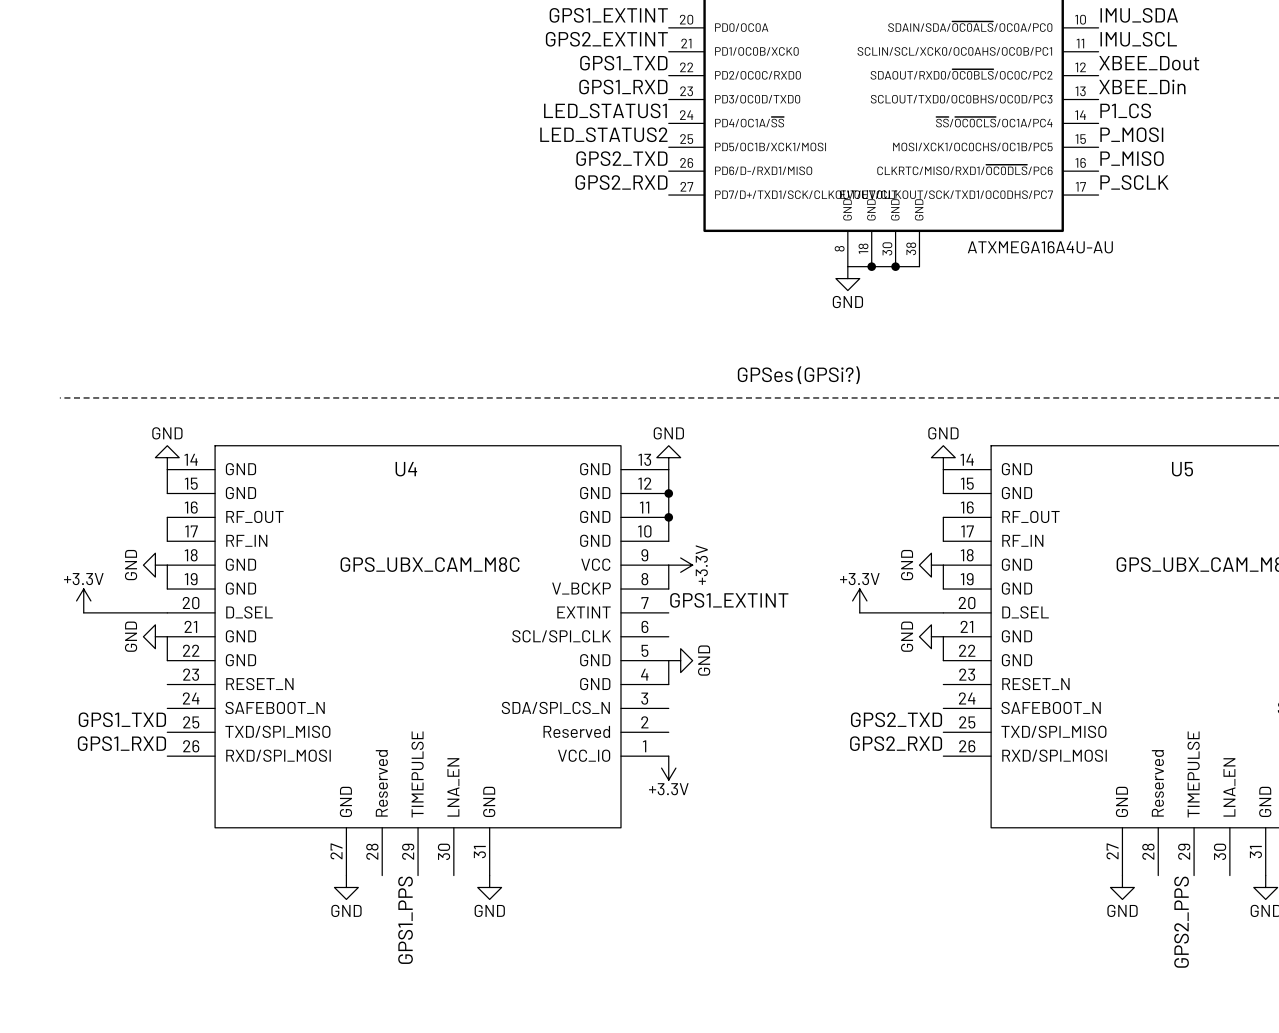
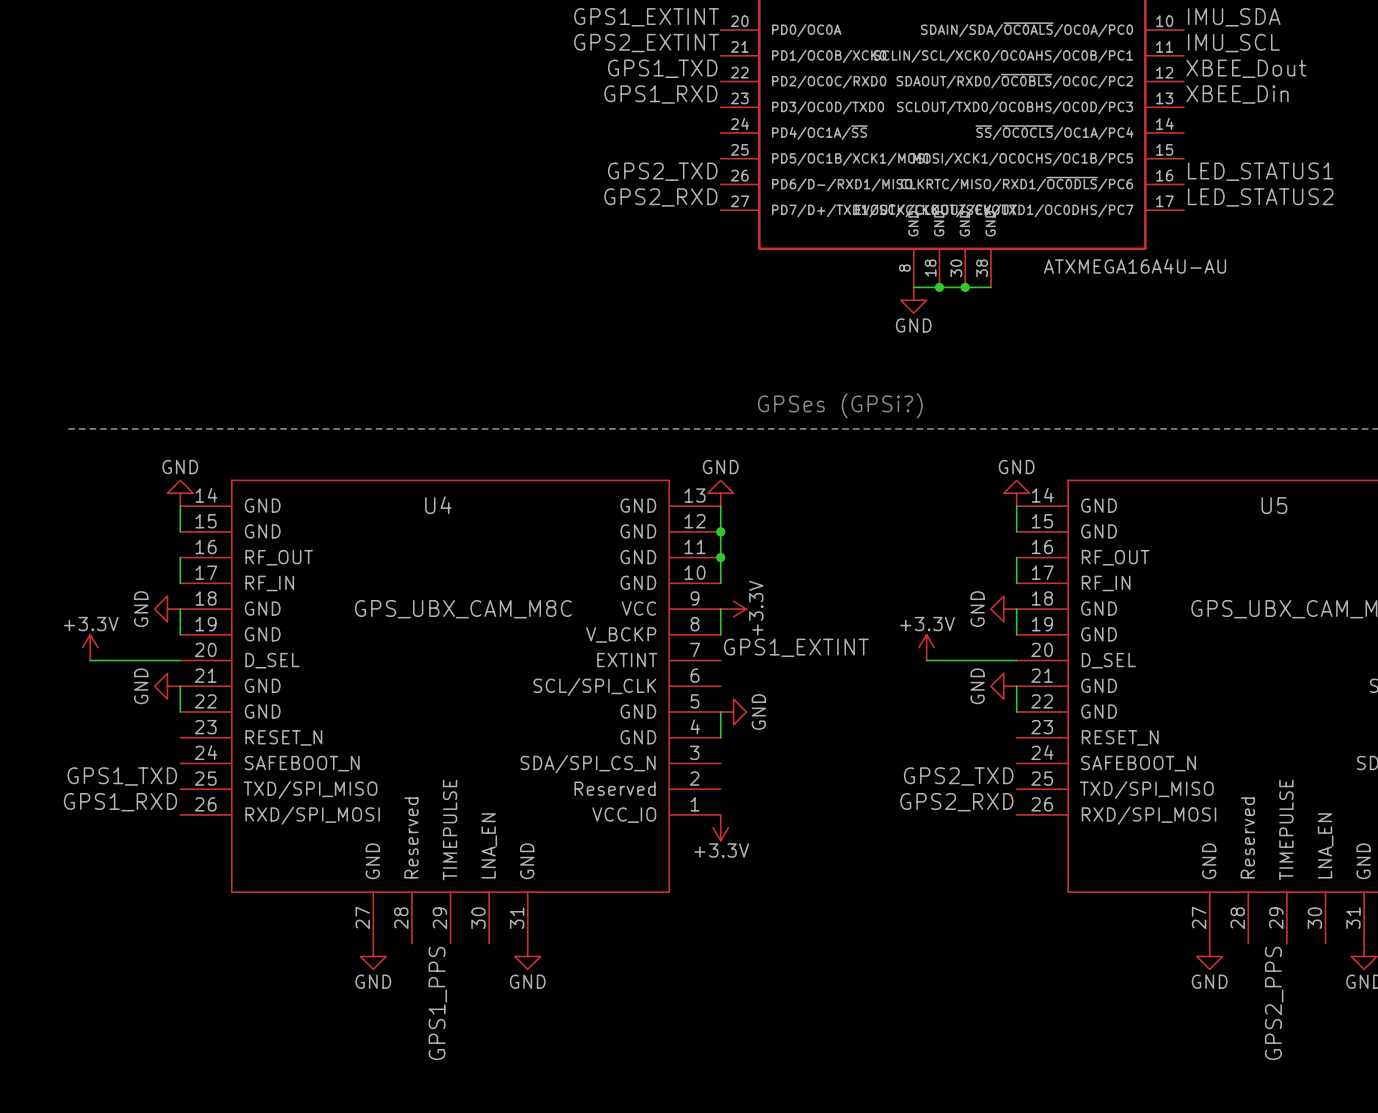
label: LED_STATUS1 (605, 110) -> none
label: P1_CS (1125, 110) -> none
label: LED_STATUS2 (603, 134) -> none
label: P_MOSI (1131, 134) -> none
label: P_MISO (1132, 158) -> LED_STATUS1 (1260, 171)
label: P_SCLK (1134, 182) -> LED_STATUS2 (1260, 197)

